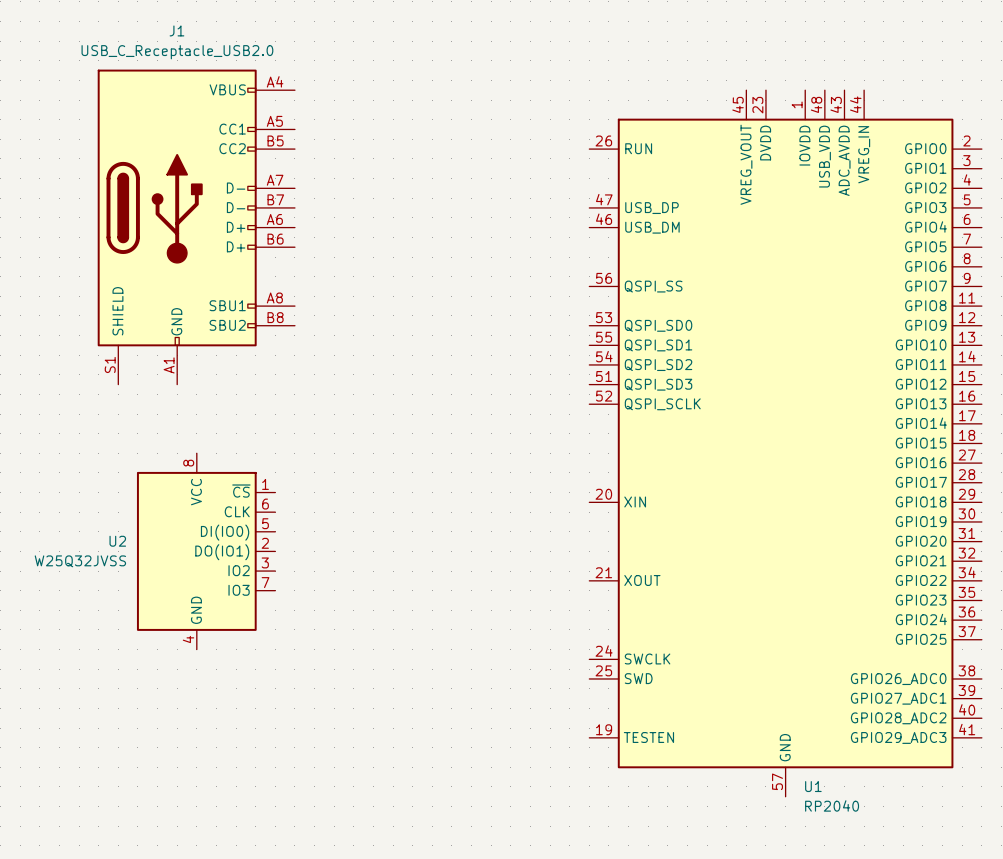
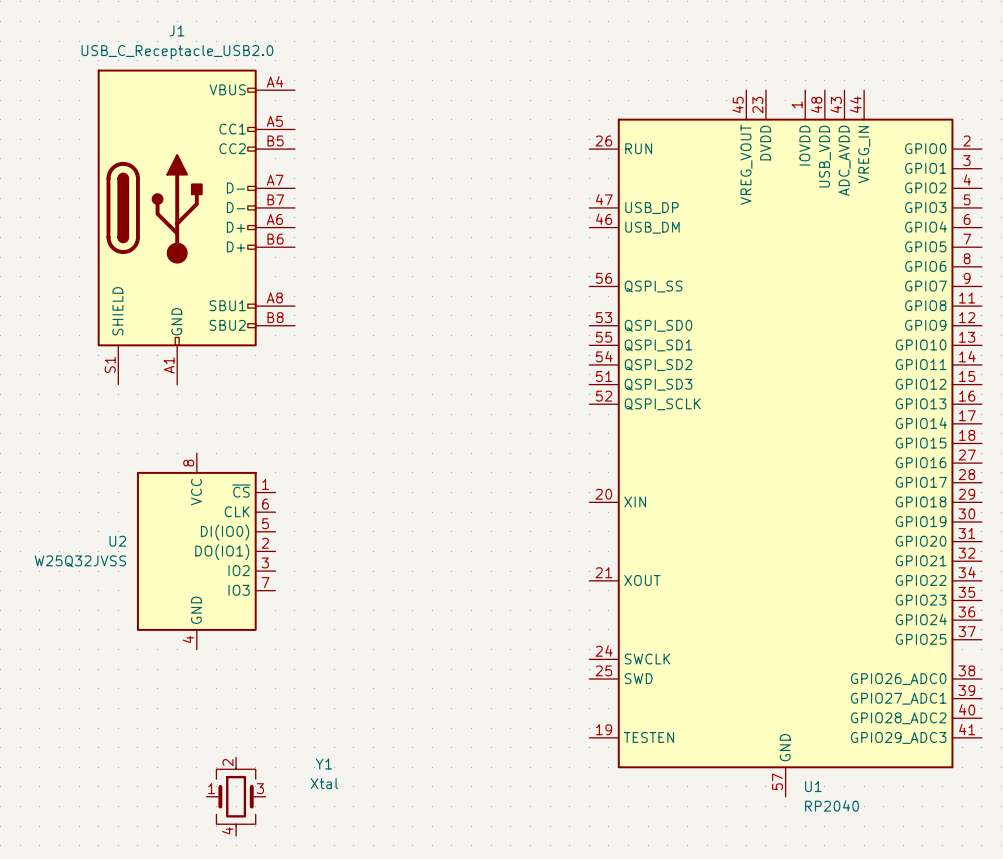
Y1: none -> Xtal (236, 796)

